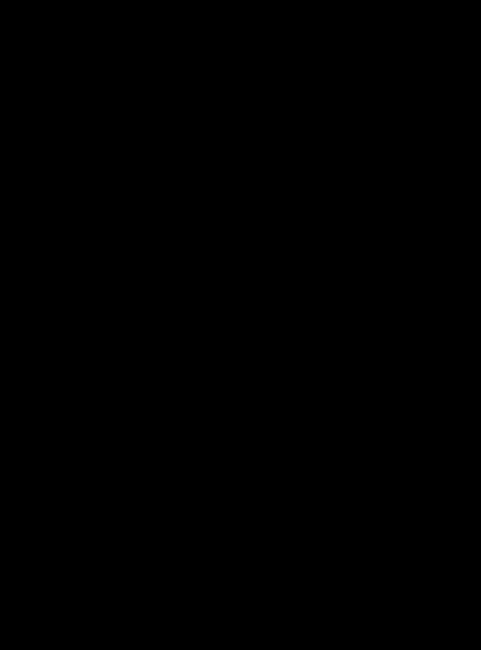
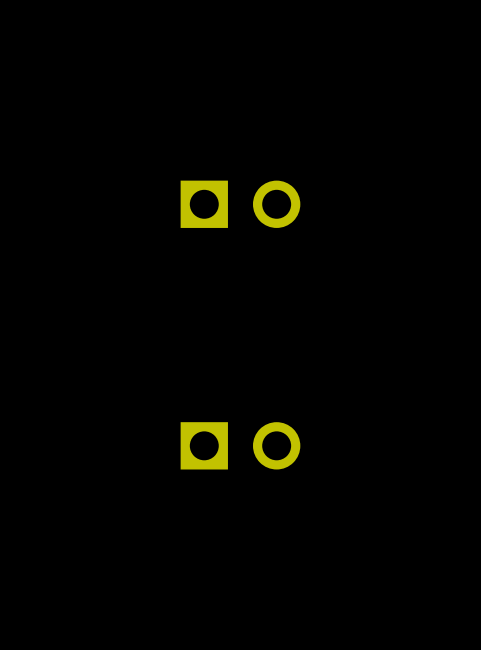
part: none -> (240, 204)
part: none -> (240, 445)

